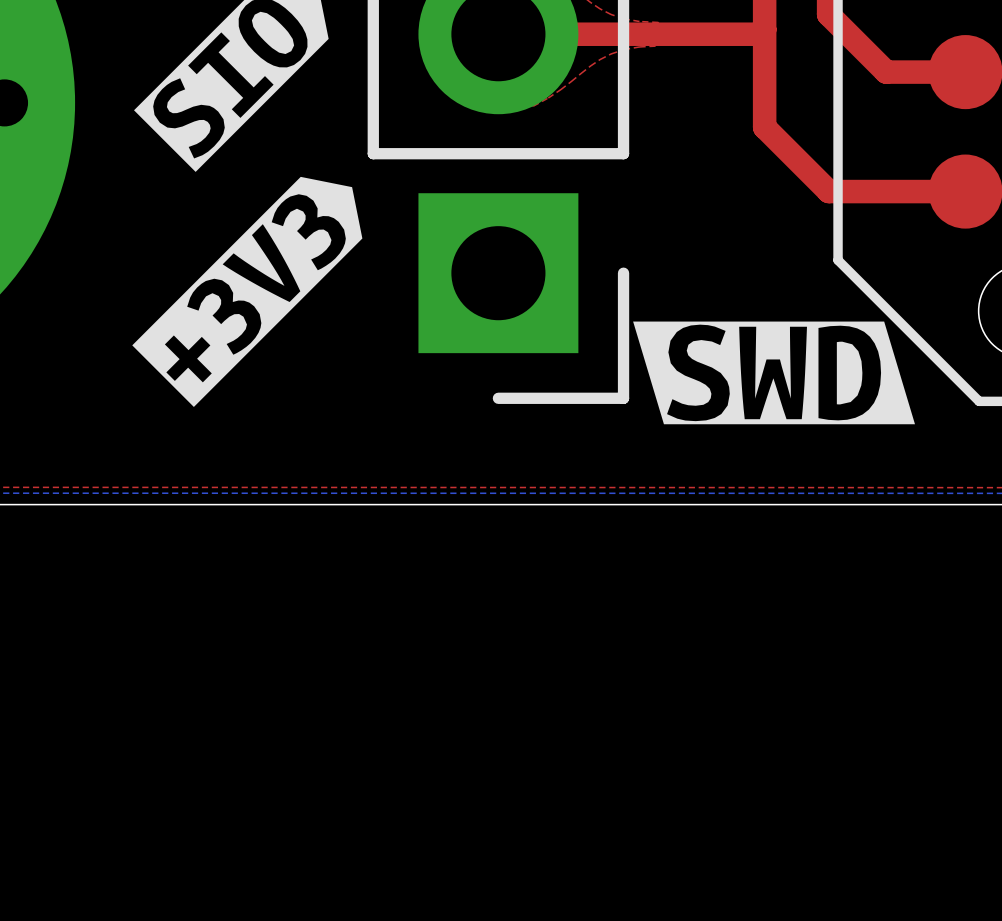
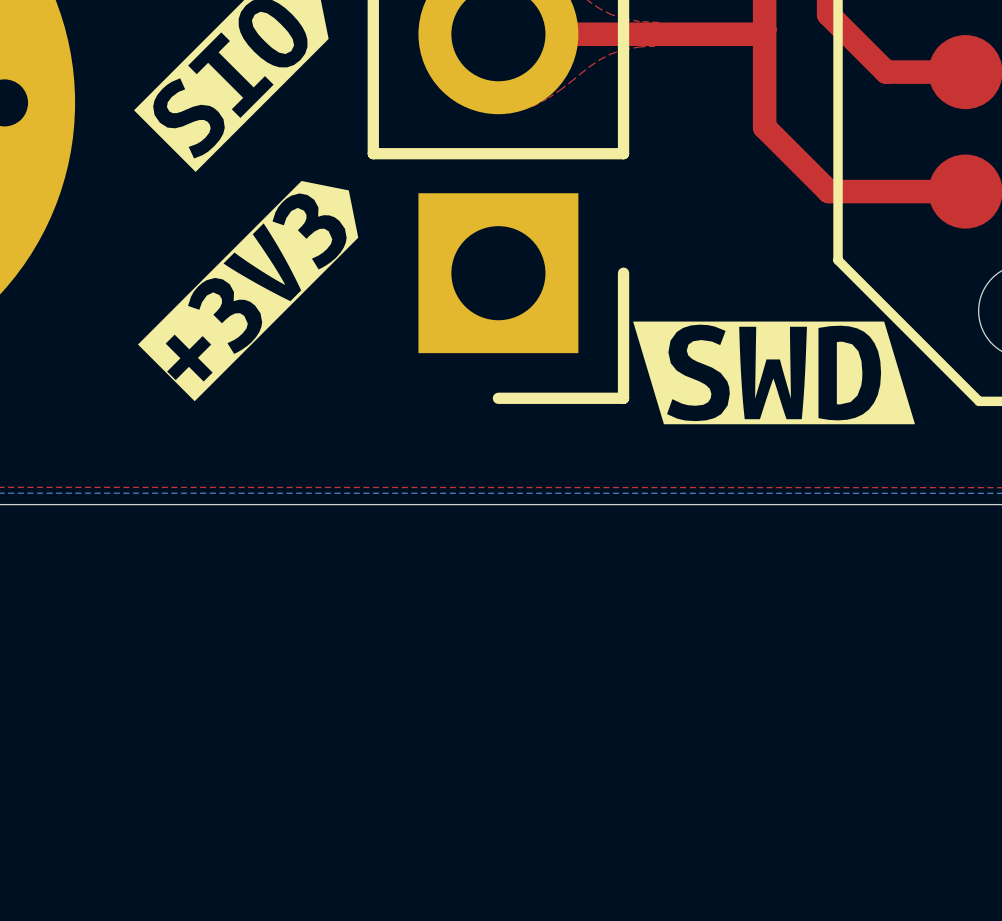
drawing shape: [132, 176, 363, 407] -> [138, 180, 359, 402]

